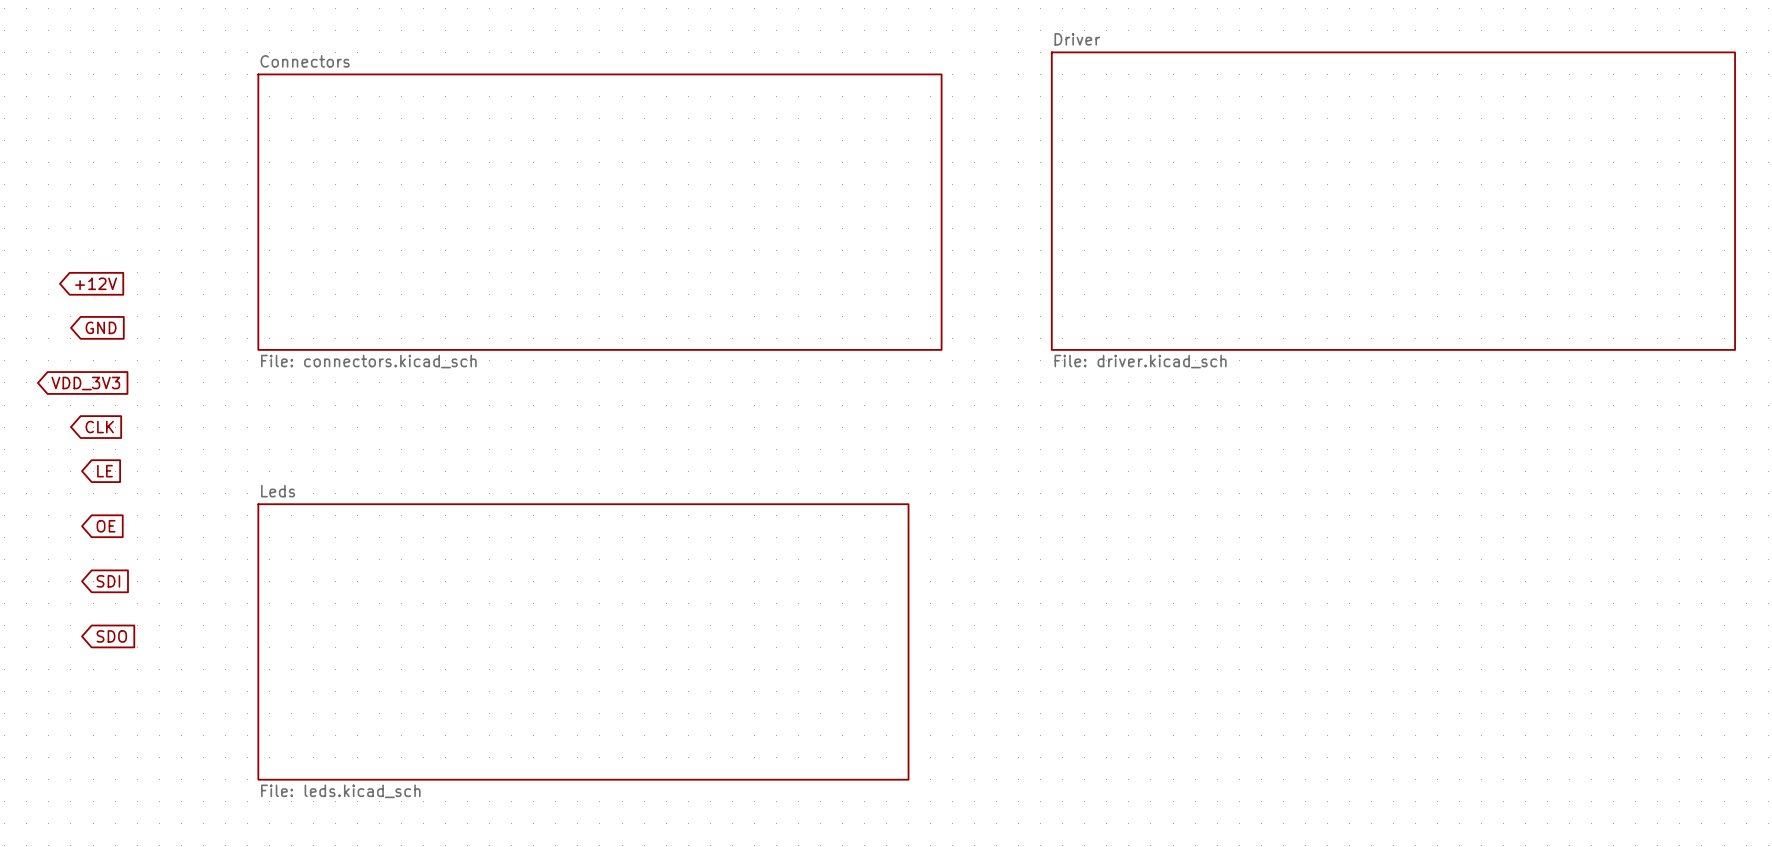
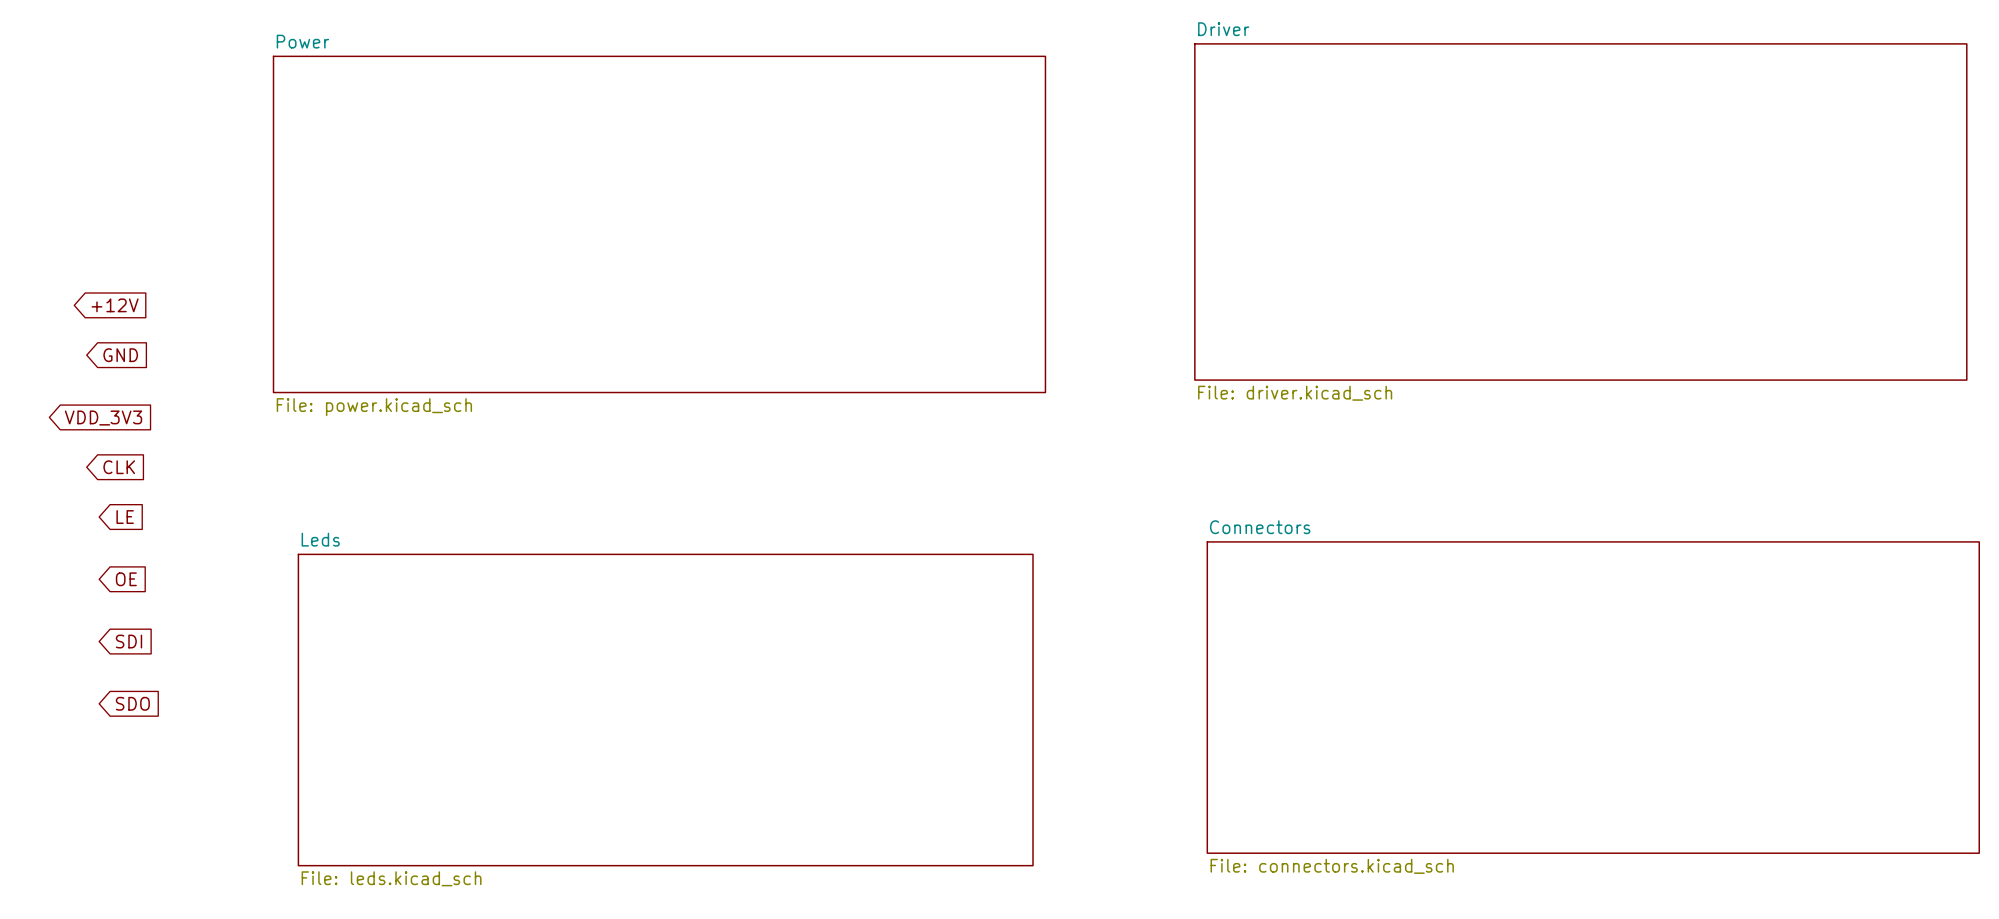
sheet Power: none -> File: power.kicad_sch (659, 224)
sheet Connectors: File: connectors.kicad_sch (599, 212) -> none
sheet Connectors: none -> File: connectors.kicad_sch (1593, 697)

